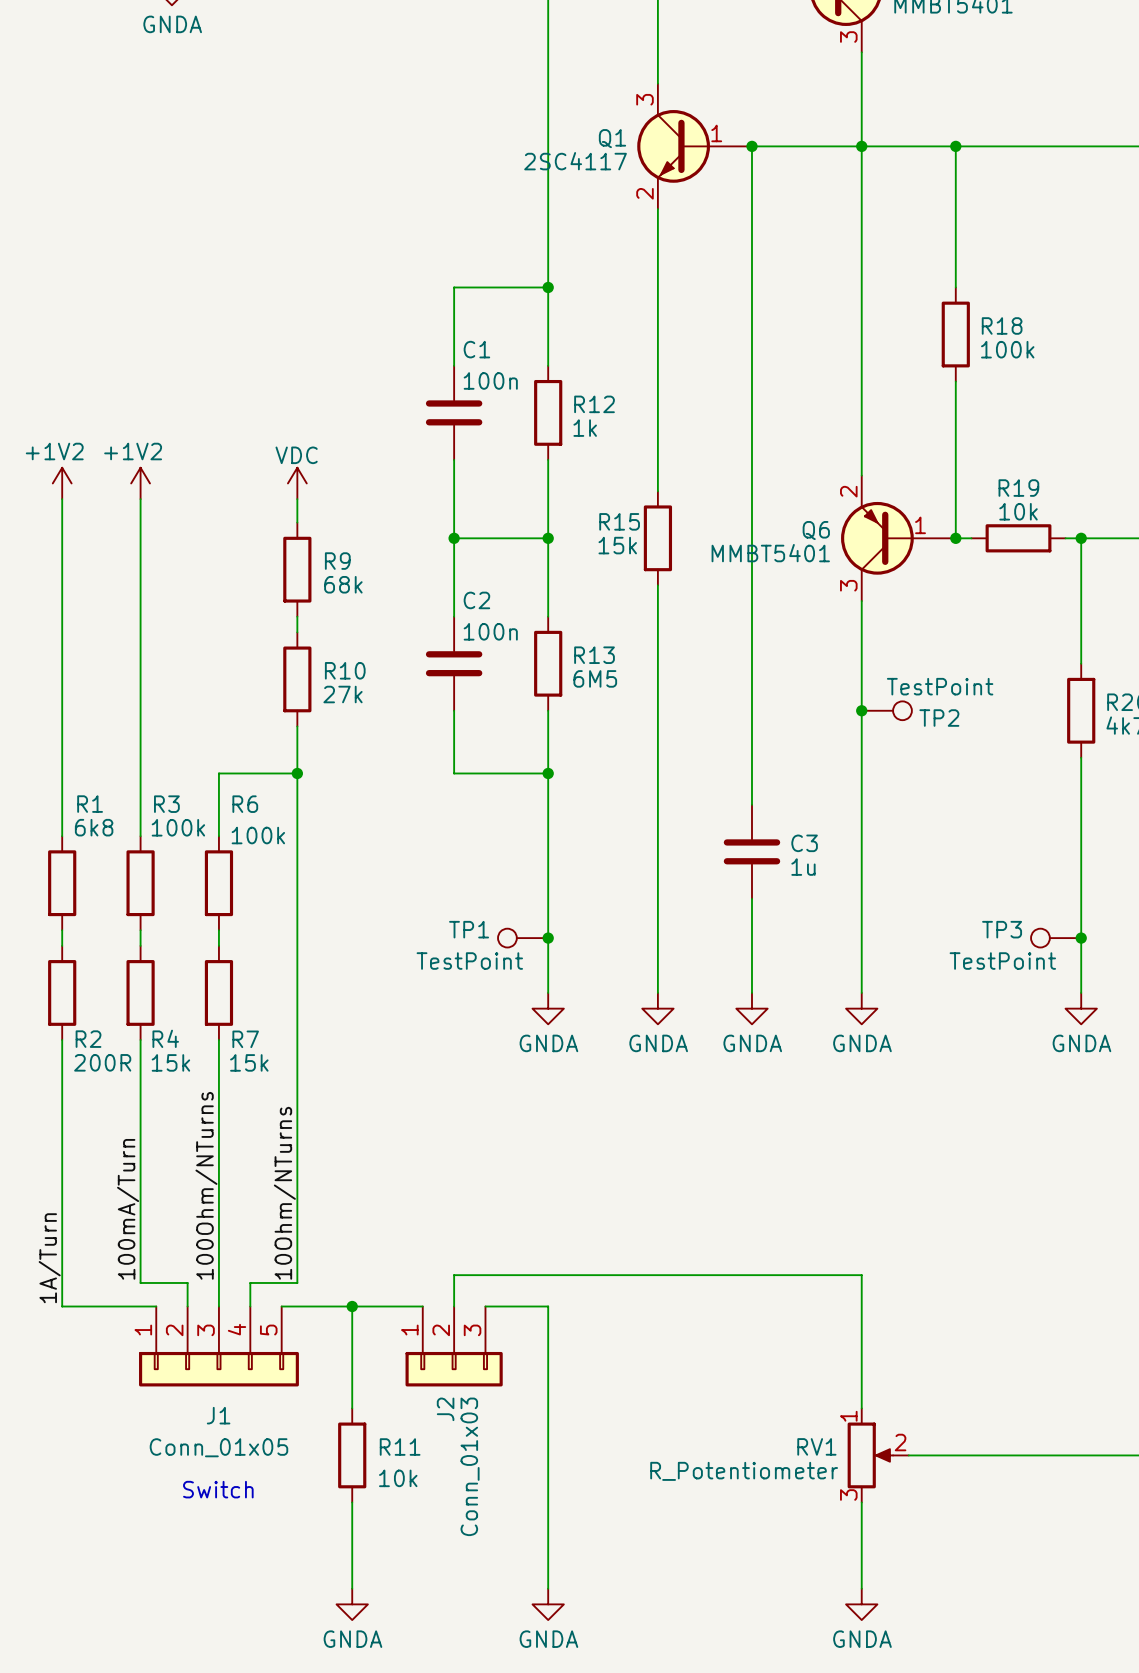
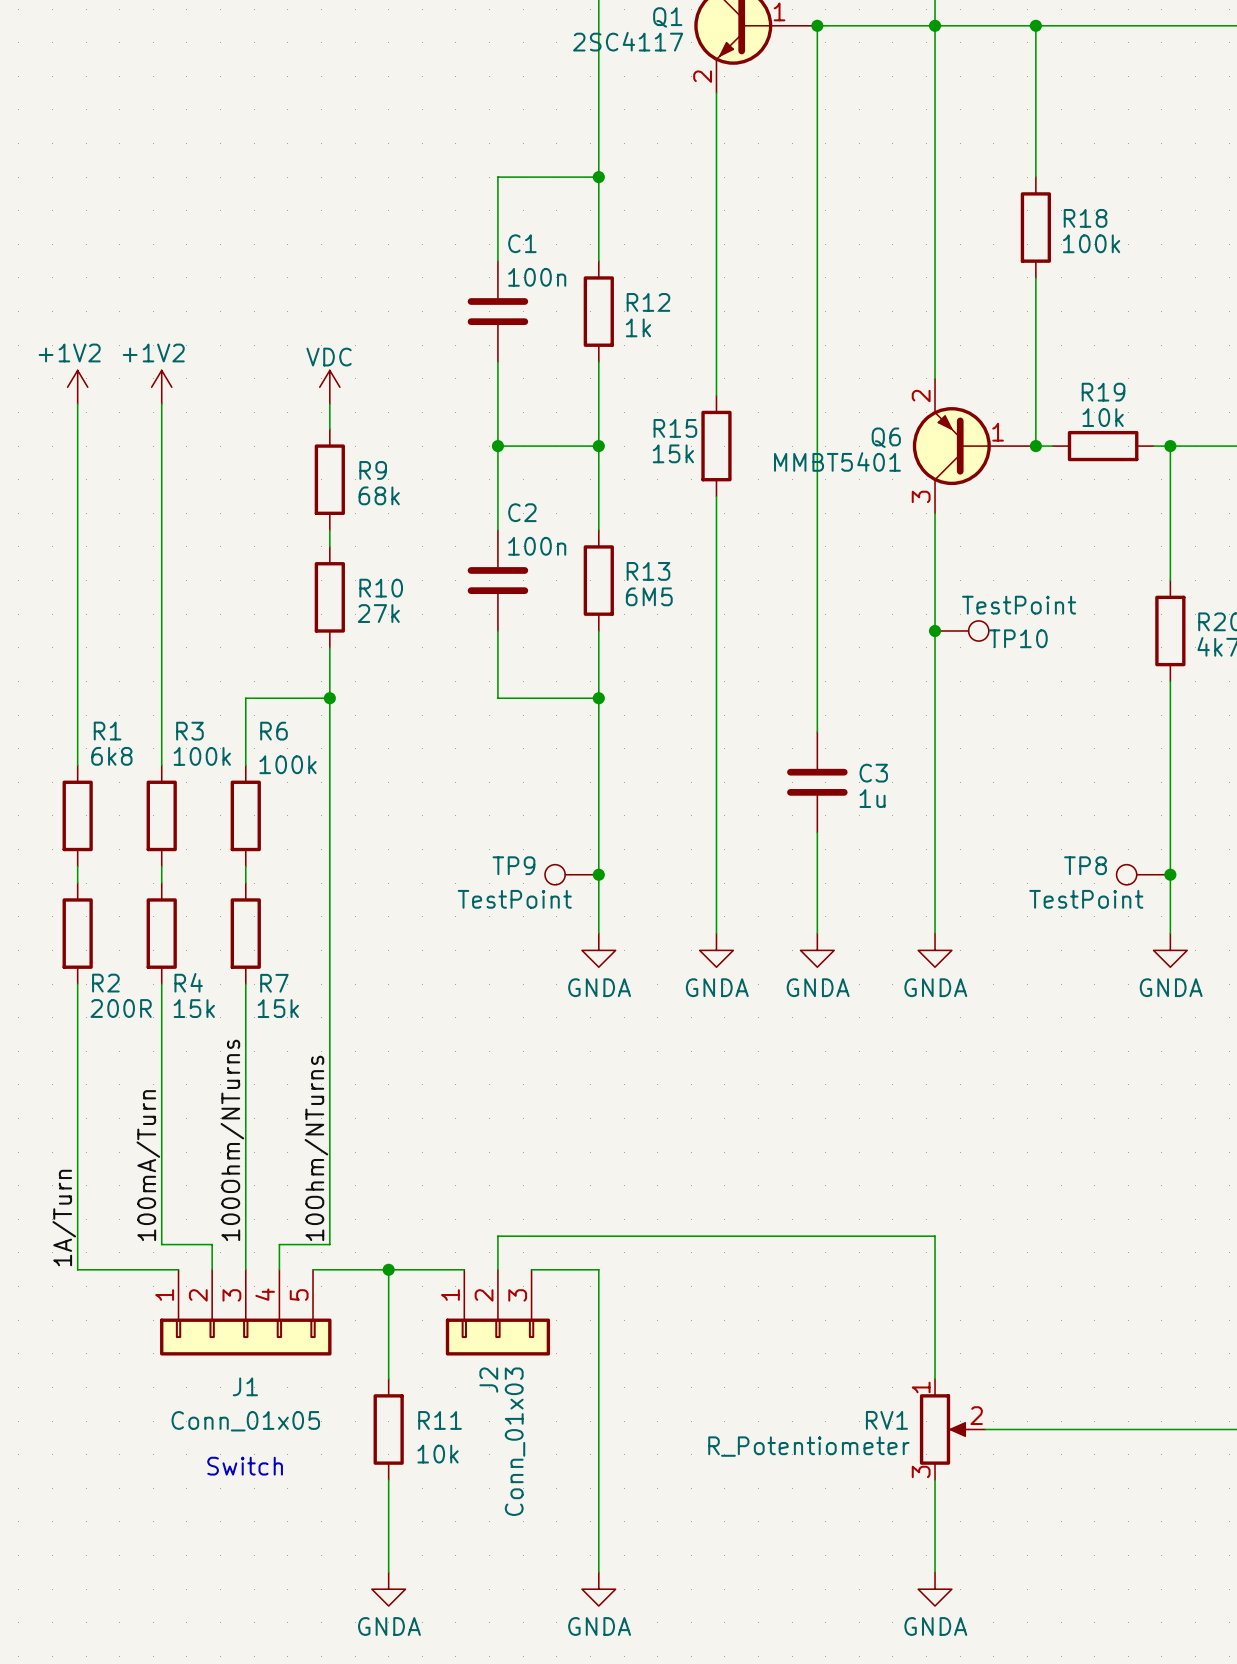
TP2 name: TP2 (939, 718) -> TP10 (1018, 638)
TP1 name: TP1 (469, 929) -> TP9 (513, 865)
TP3 name: TP3 (1002, 929) -> TP8 (1085, 865)

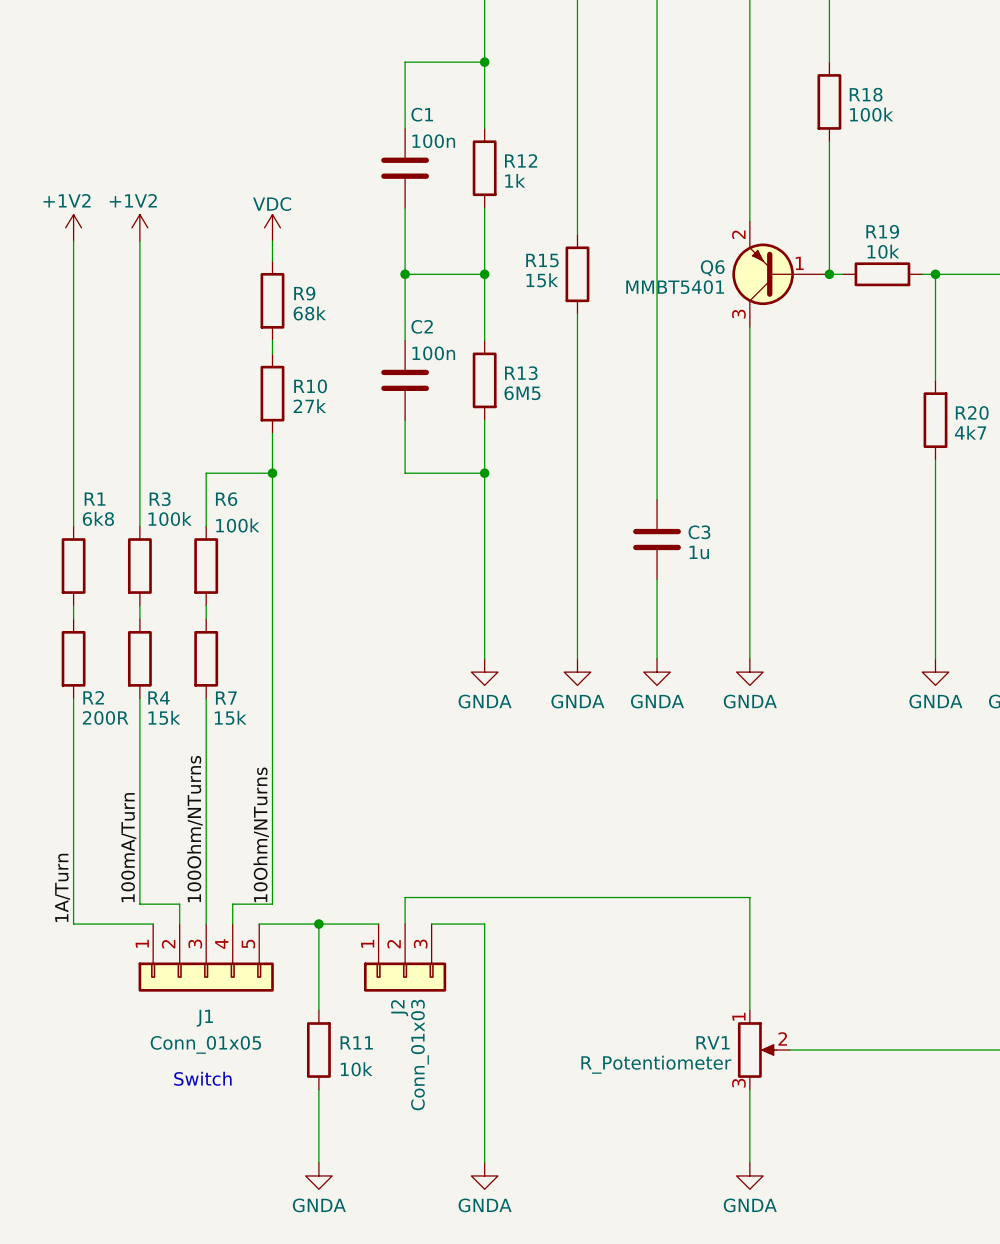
junction: (935, 630) -> none
TP10: TestPoint (961, 630) -> none
TP9: TestPoint (571, 874) -> none
junction: (598, 874) -> none
TP8: TestPoint (1143, 874) -> none
junction: (1170, 874) -> none

